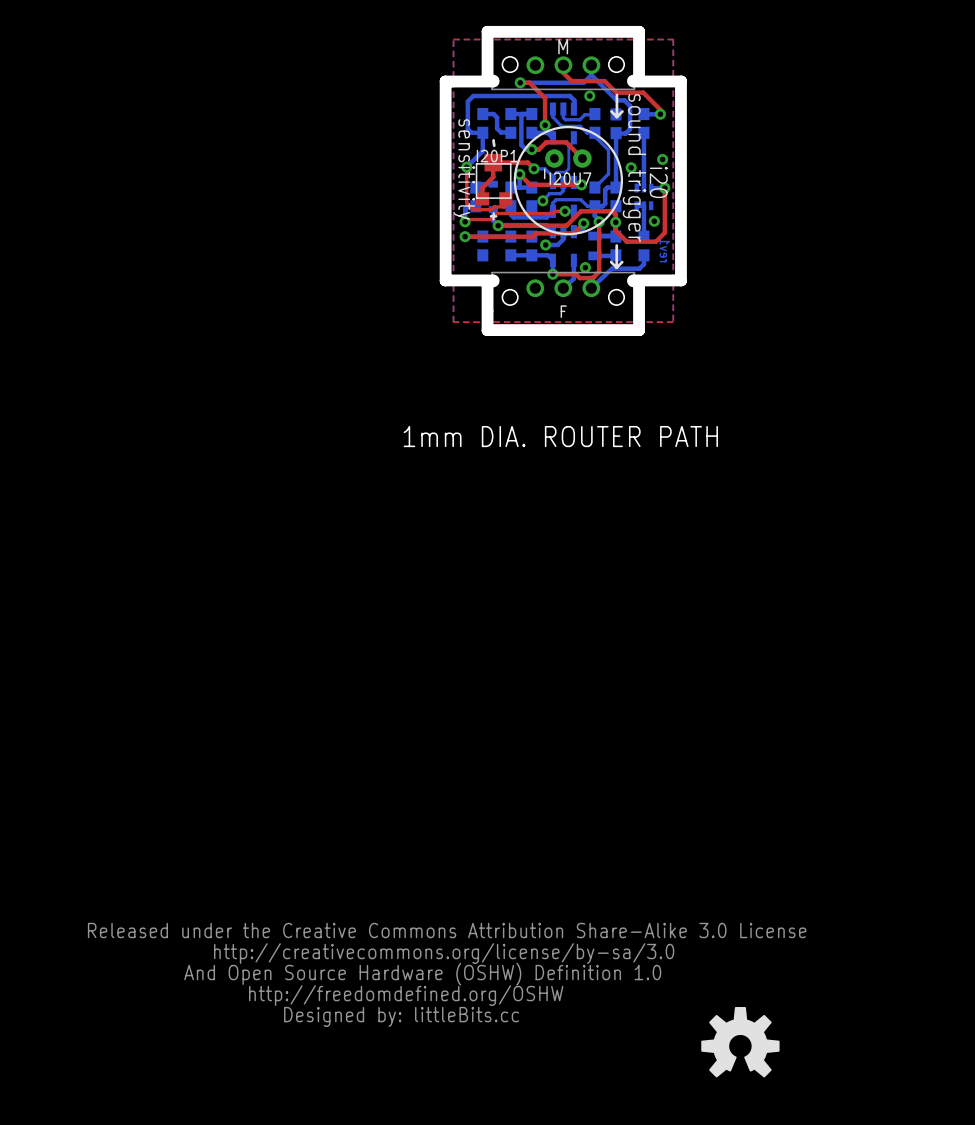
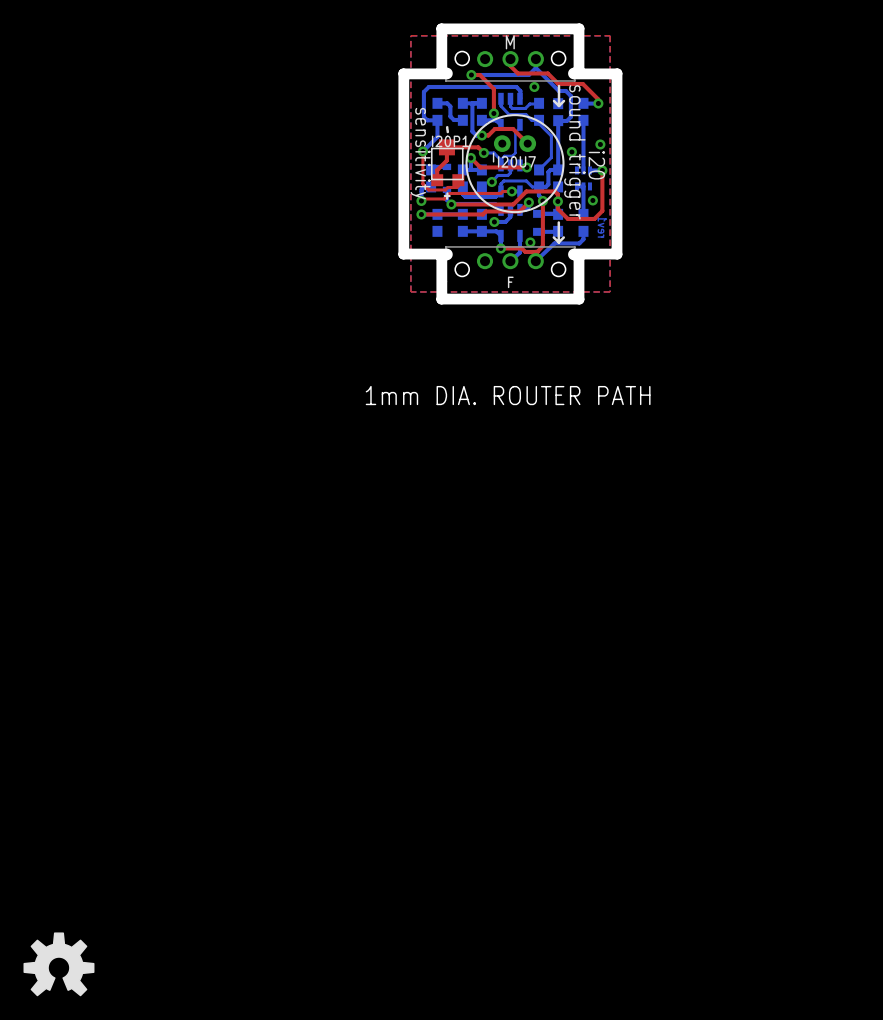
drawing: [701, 1007, 780, 1078] -> none
drawing: none -> [23, 932, 95, 997]

